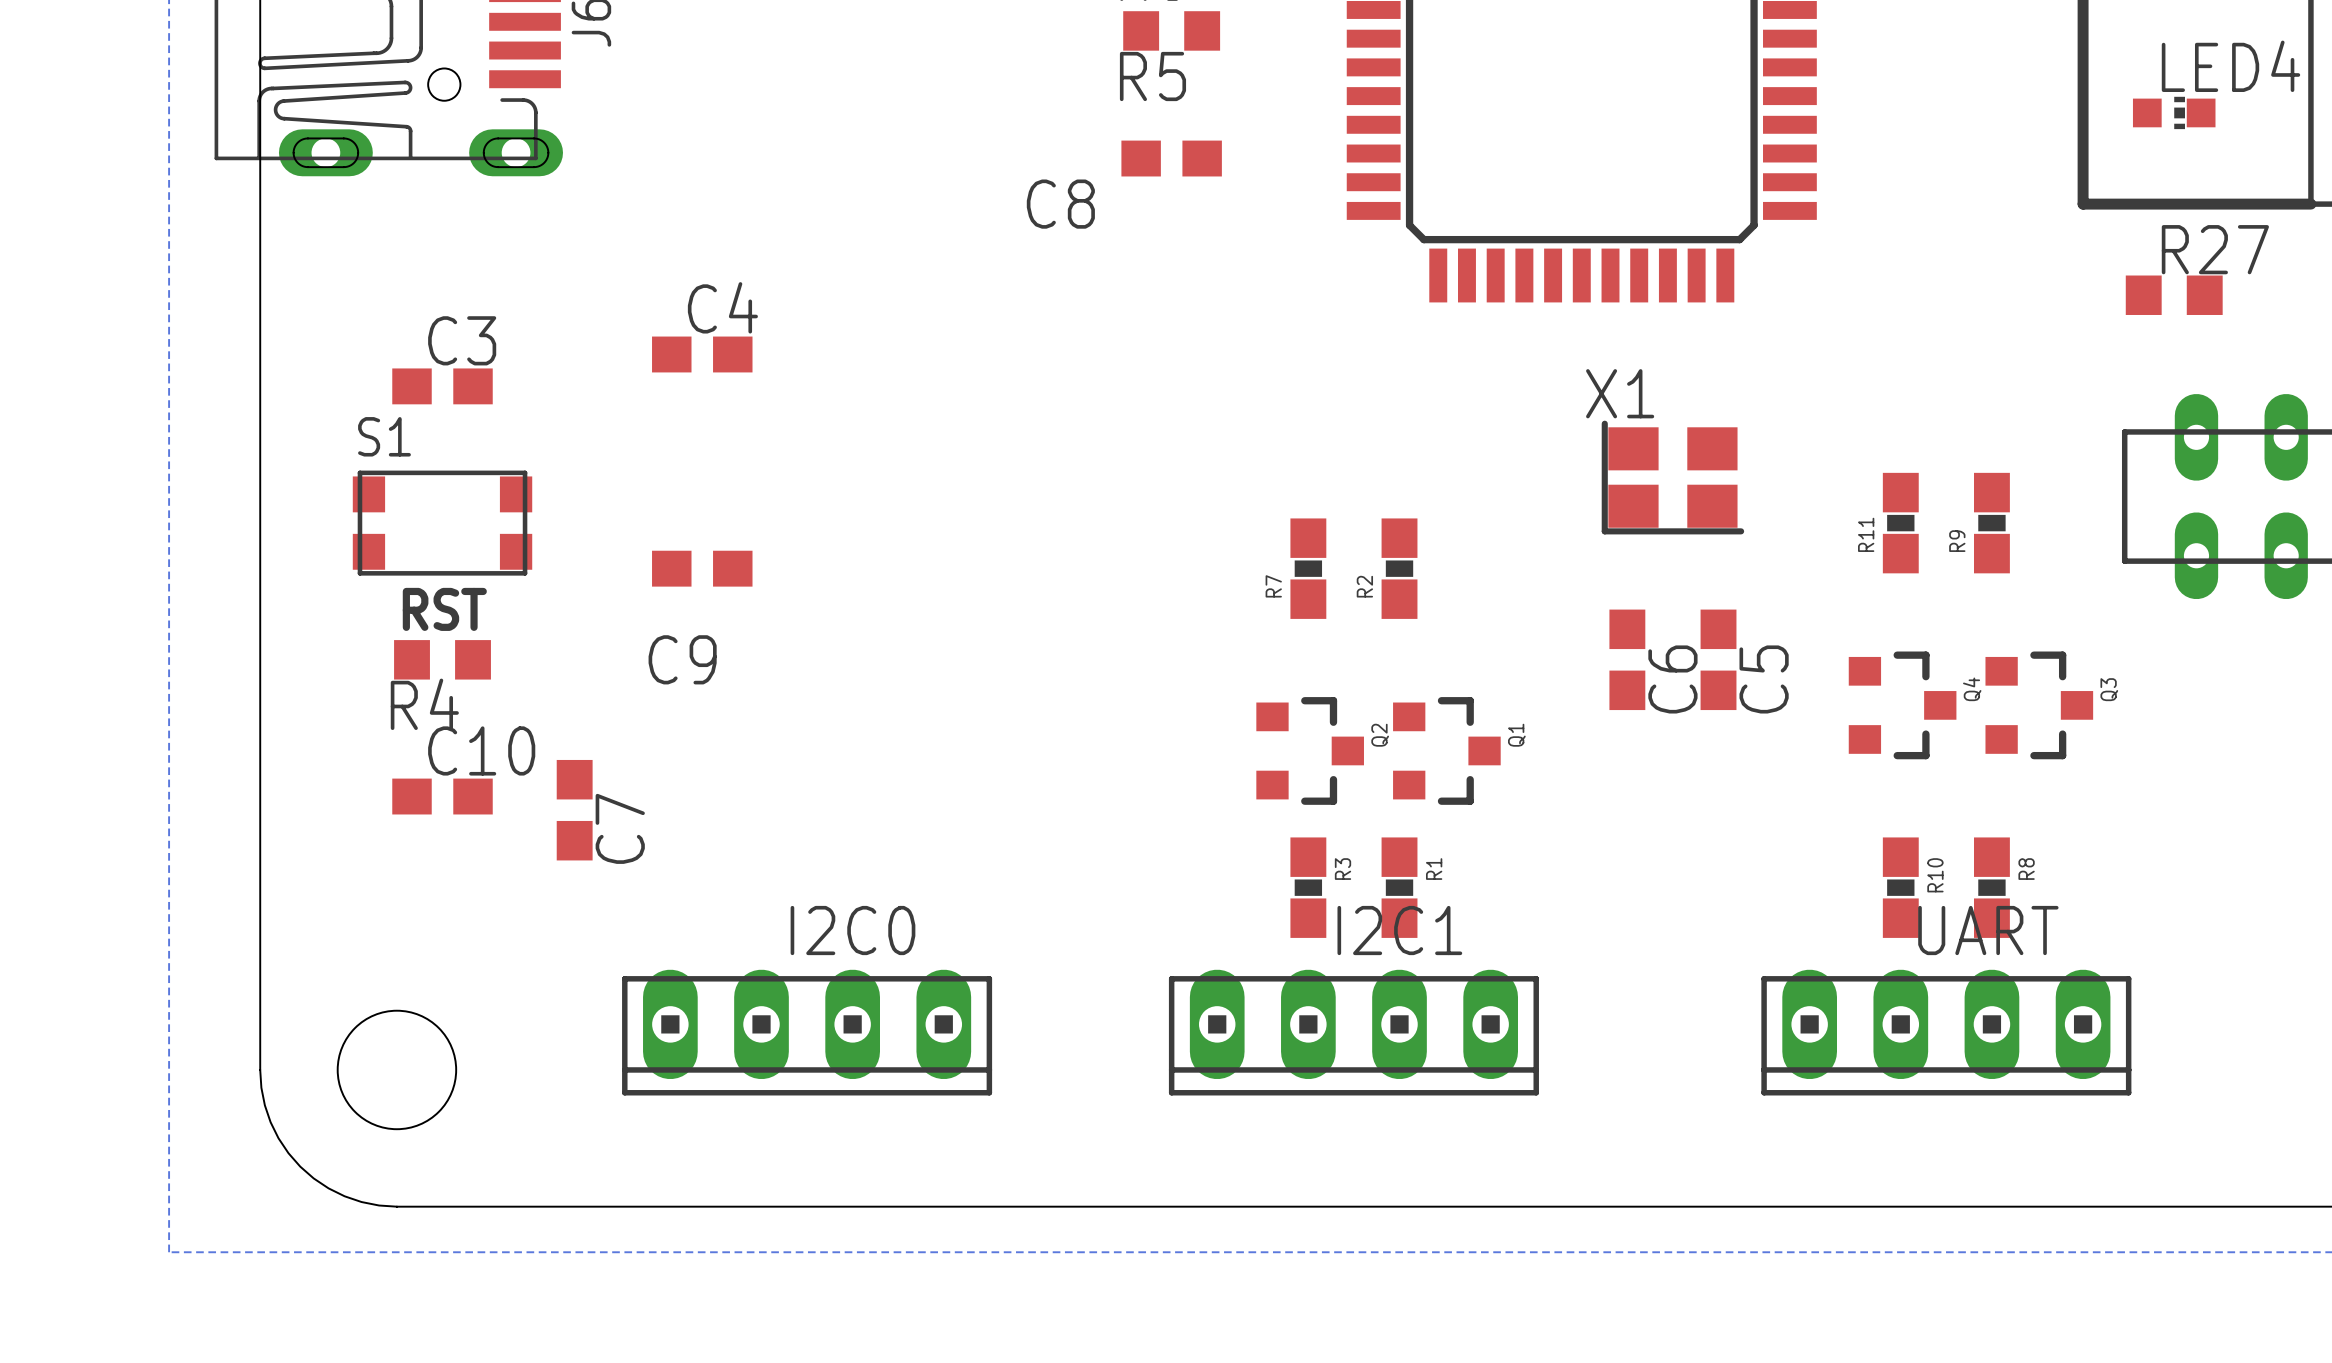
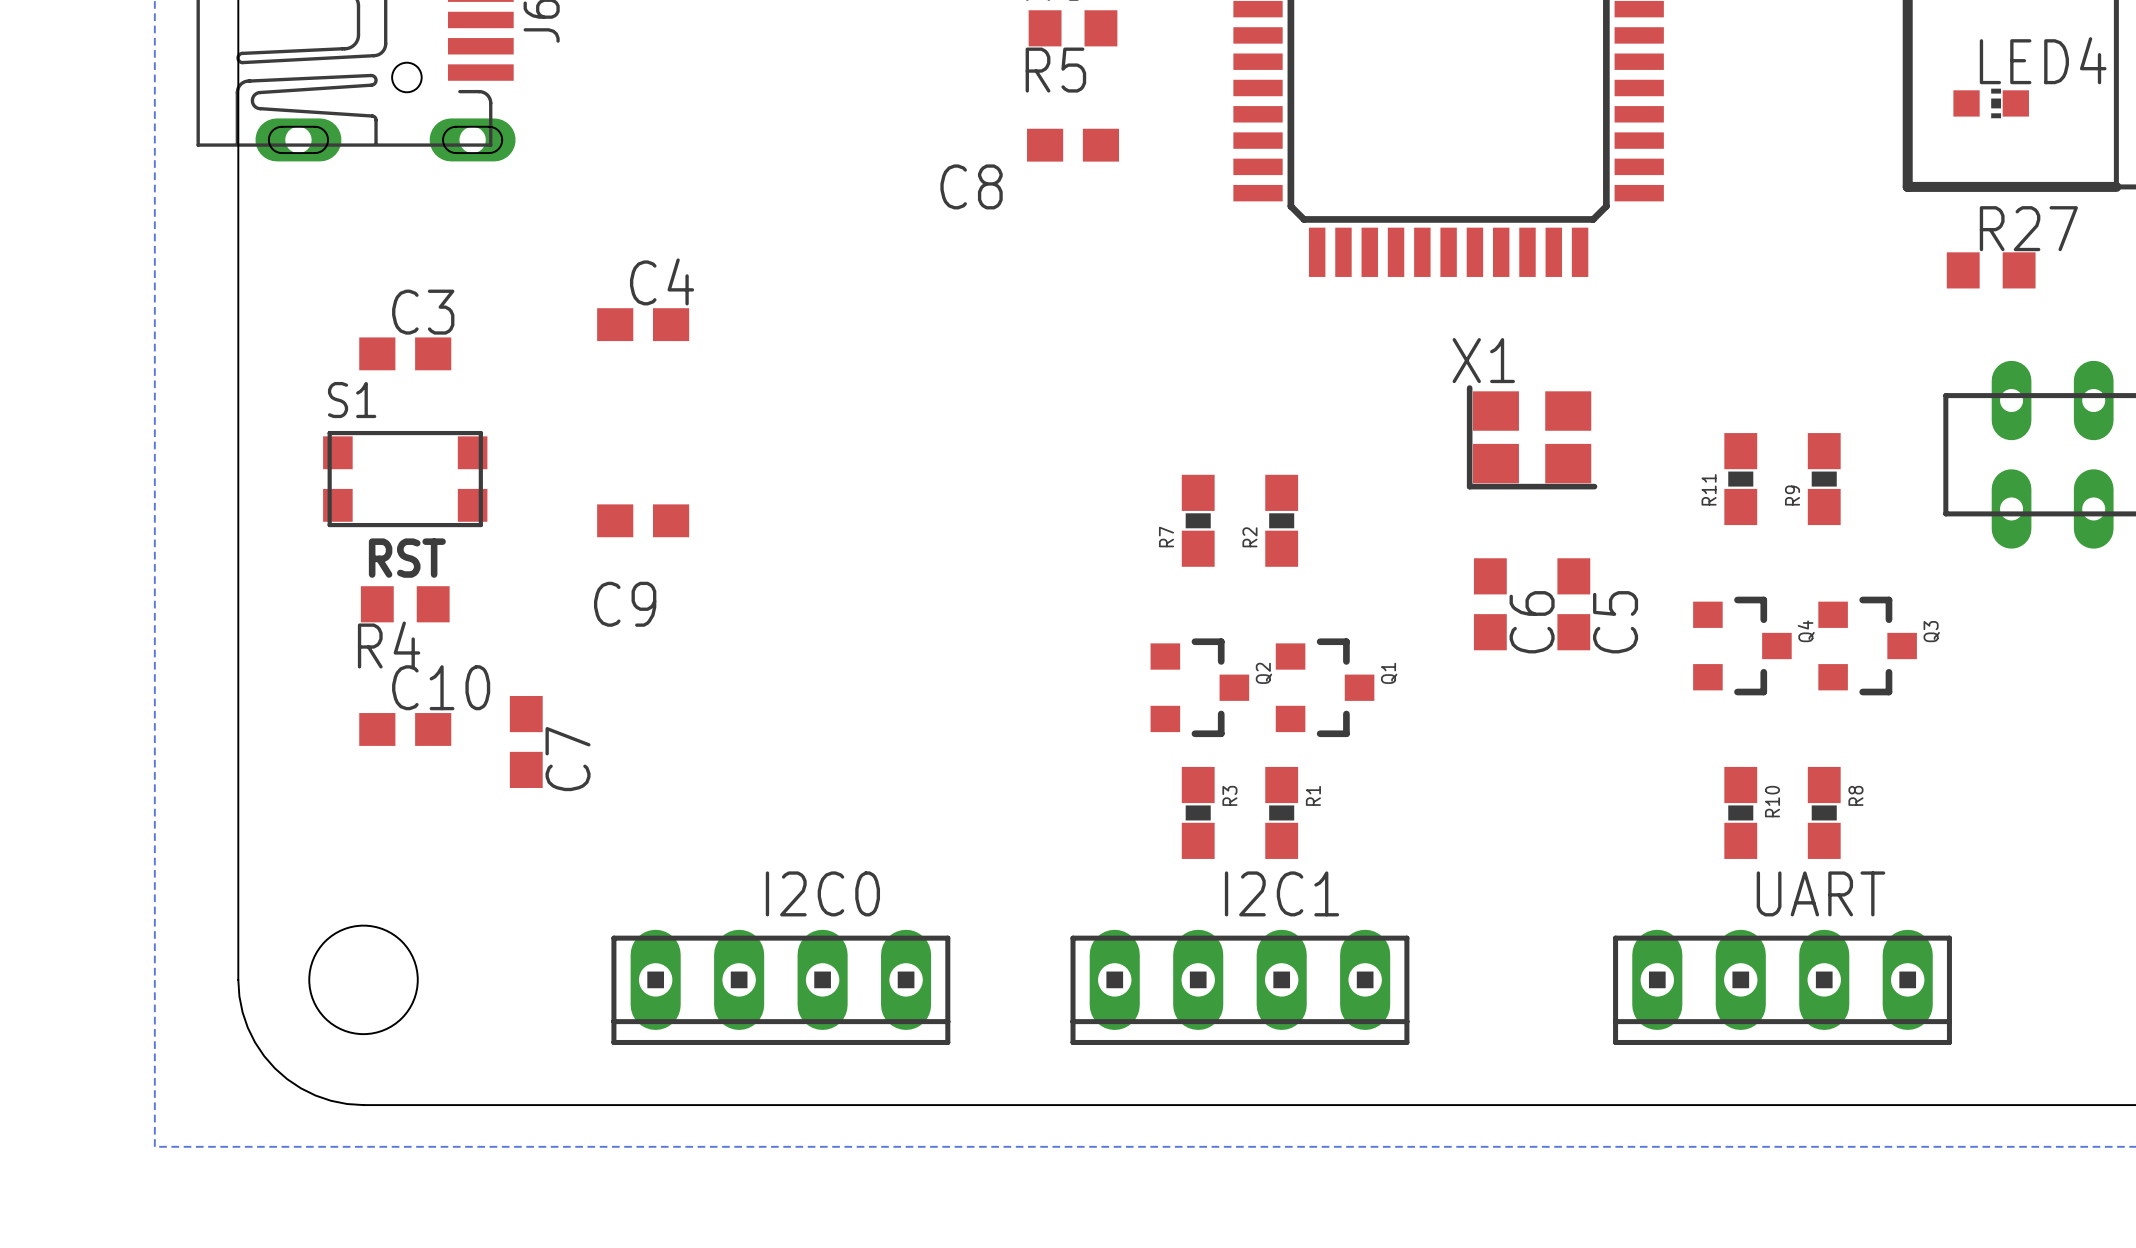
I2C0 position: (807, 1032) -> (780, 987)
I2C1 position: (1353, 1032) -> (1239, 987)
UART position: (1946, 1032) -> (1782, 987)

